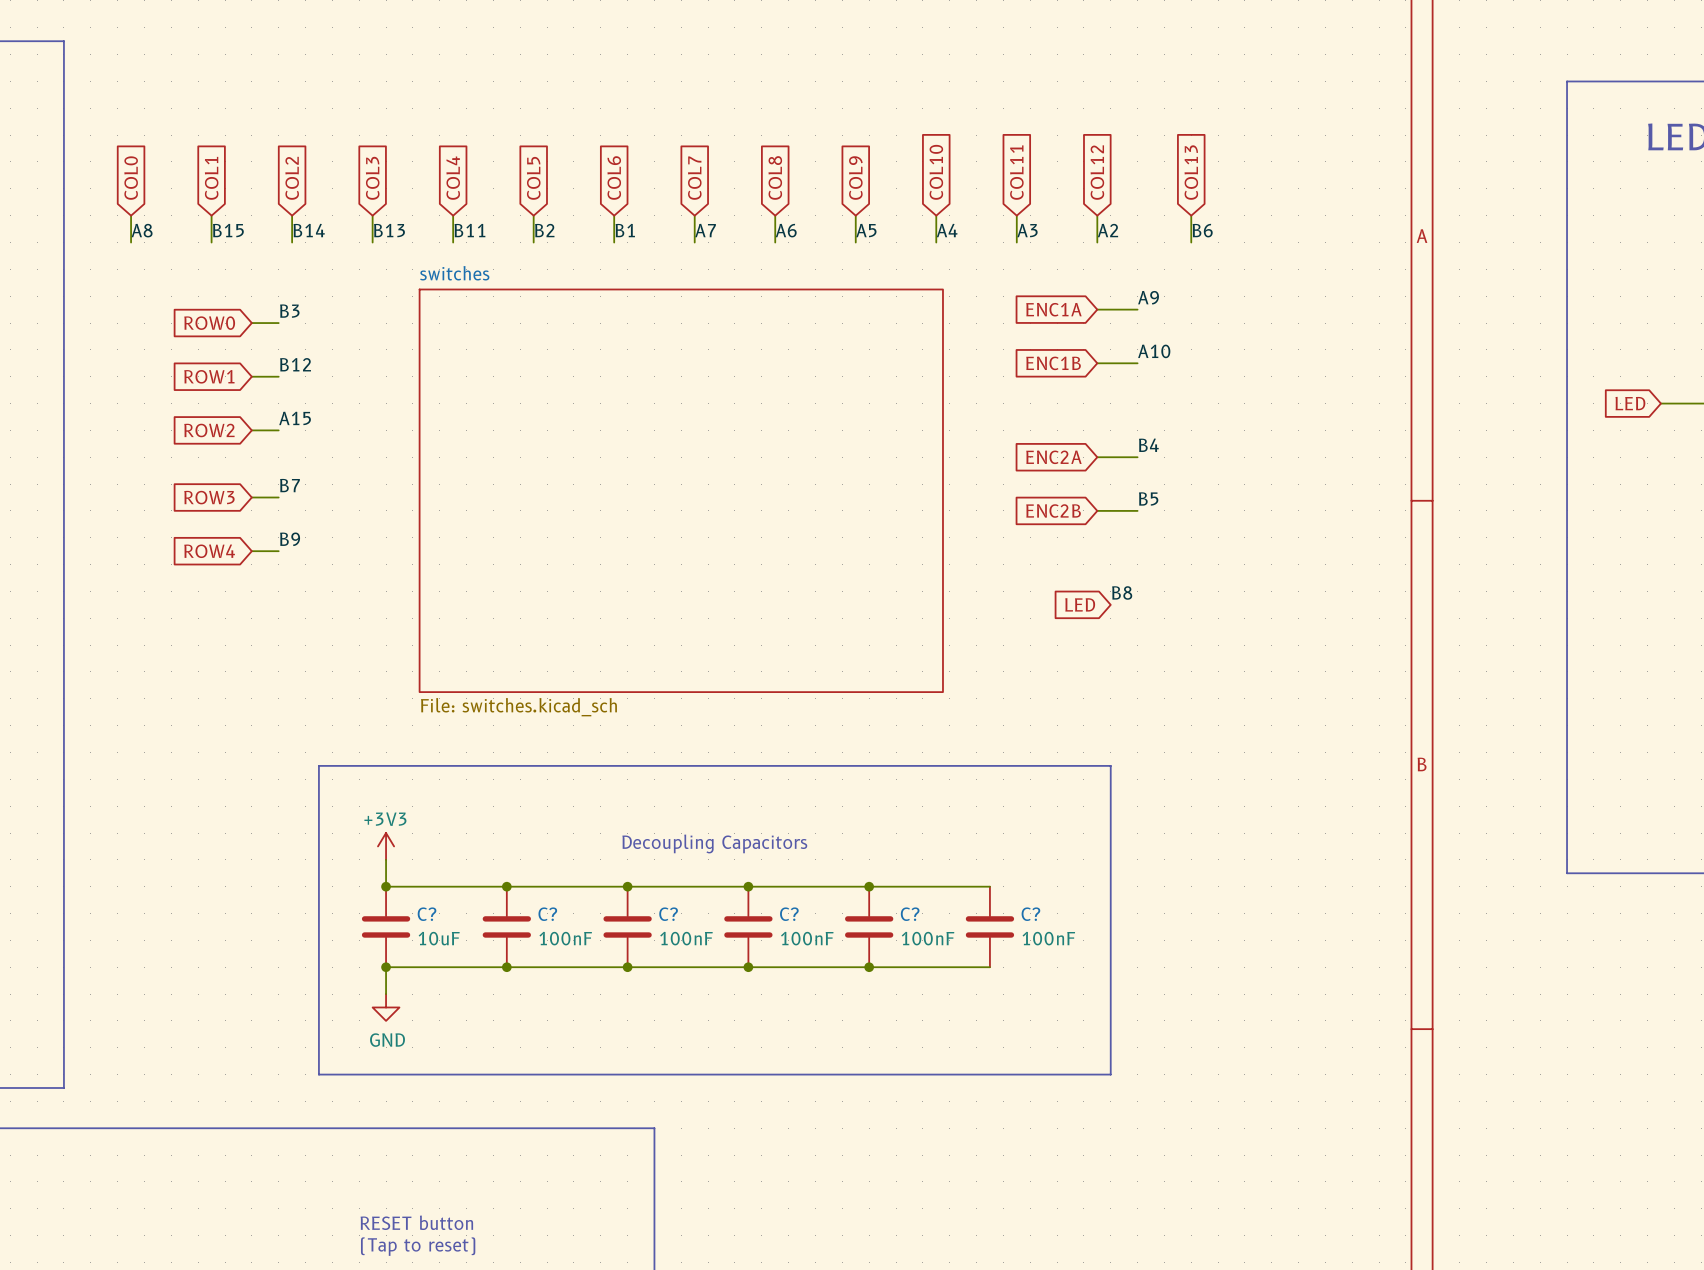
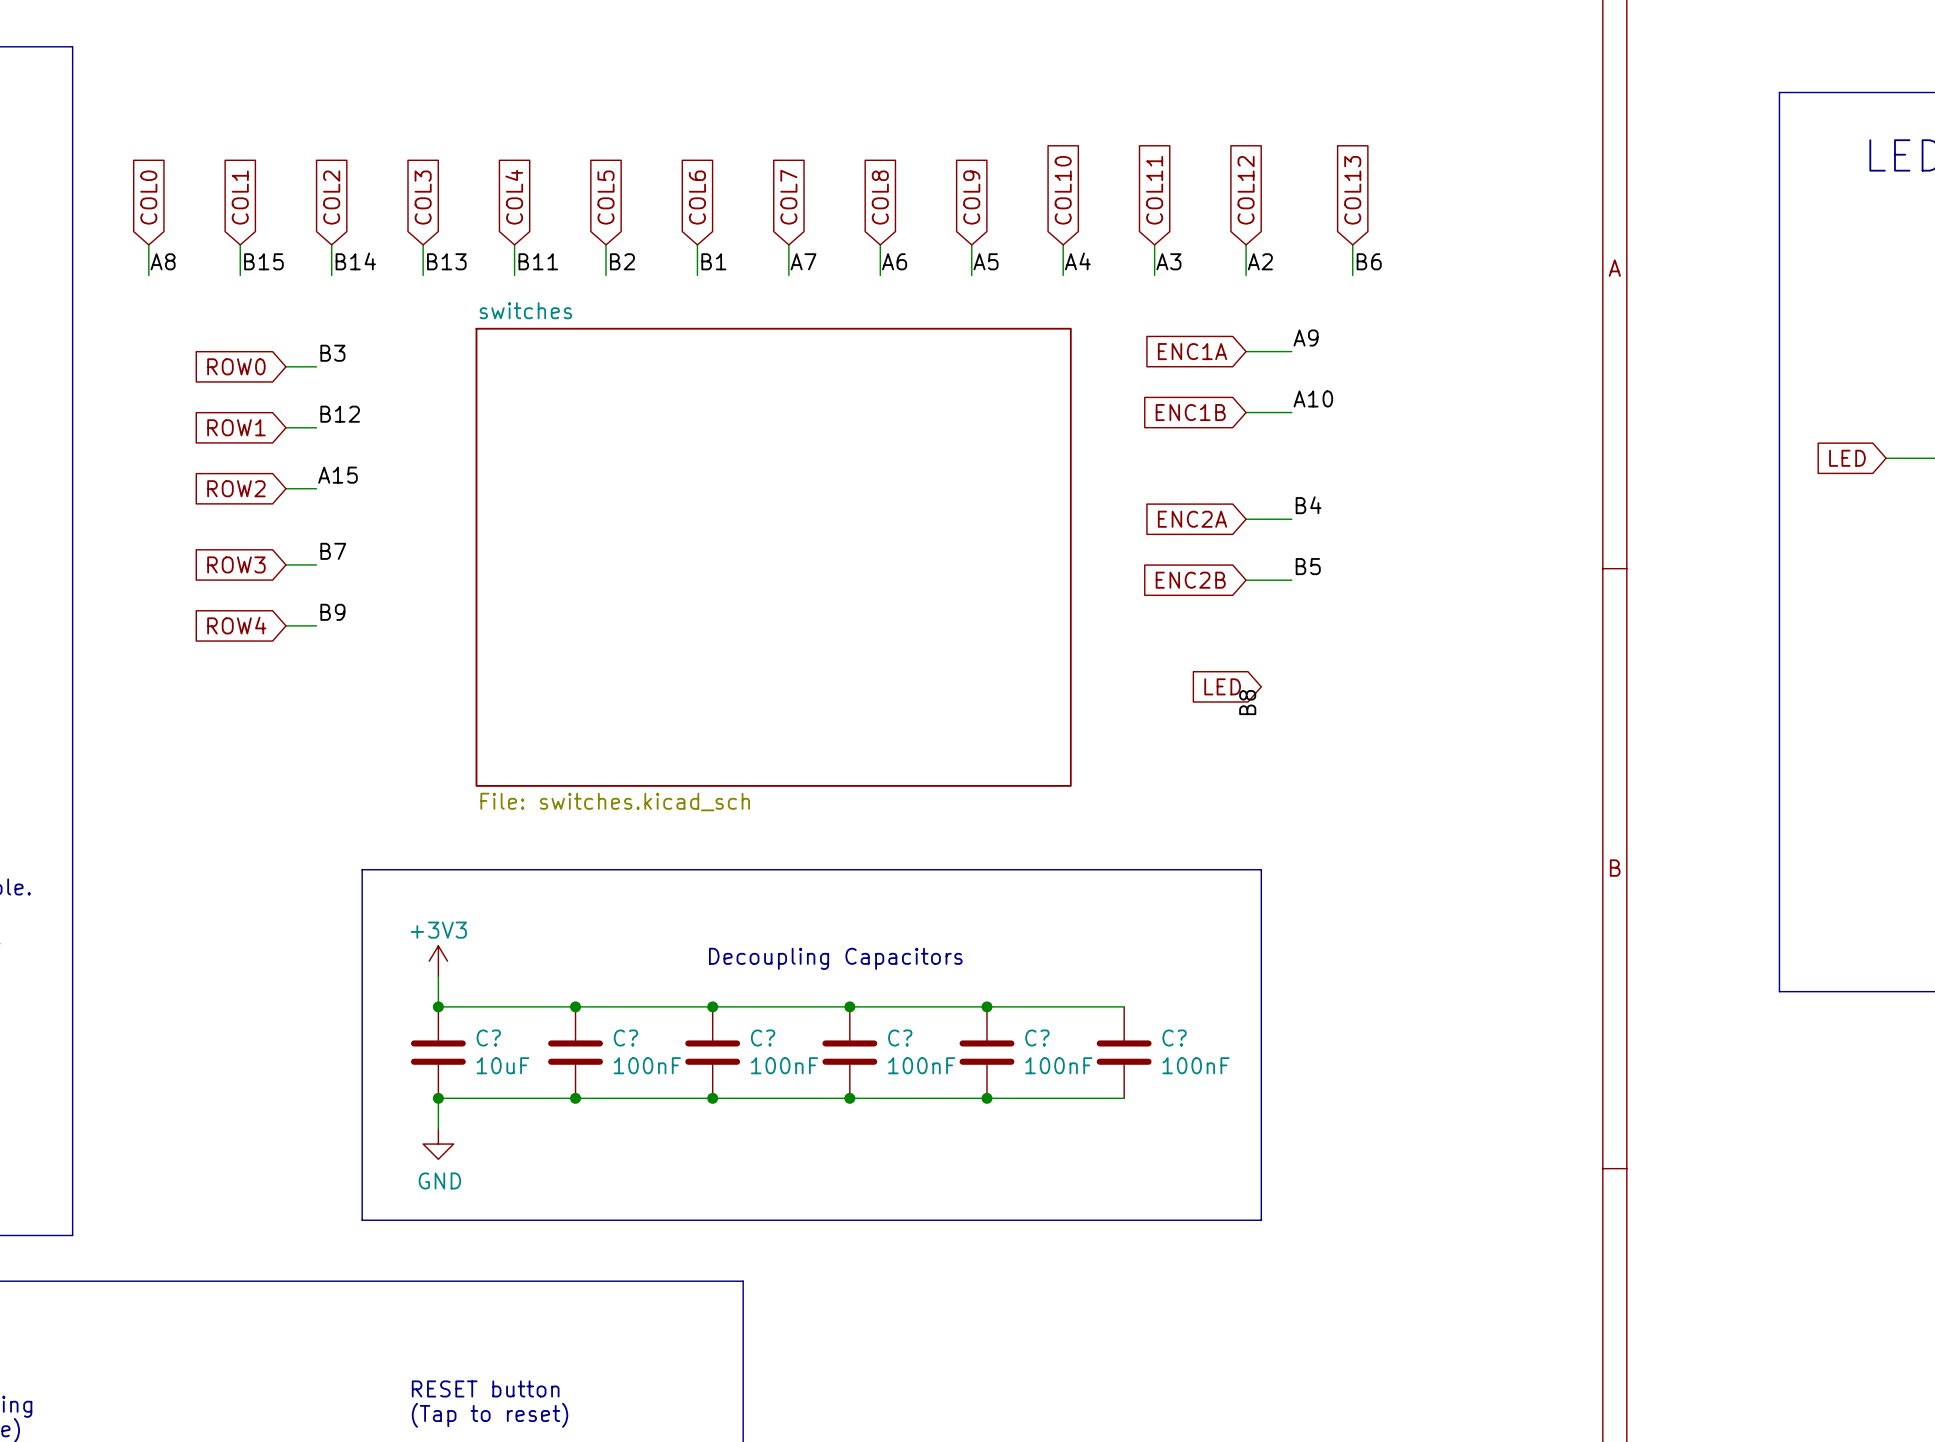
label rotation: 0° (1122, 592) -> 90° counterclockwise (1247, 702)
label position: B8 (1122, 592) -> B8 (1247, 702)

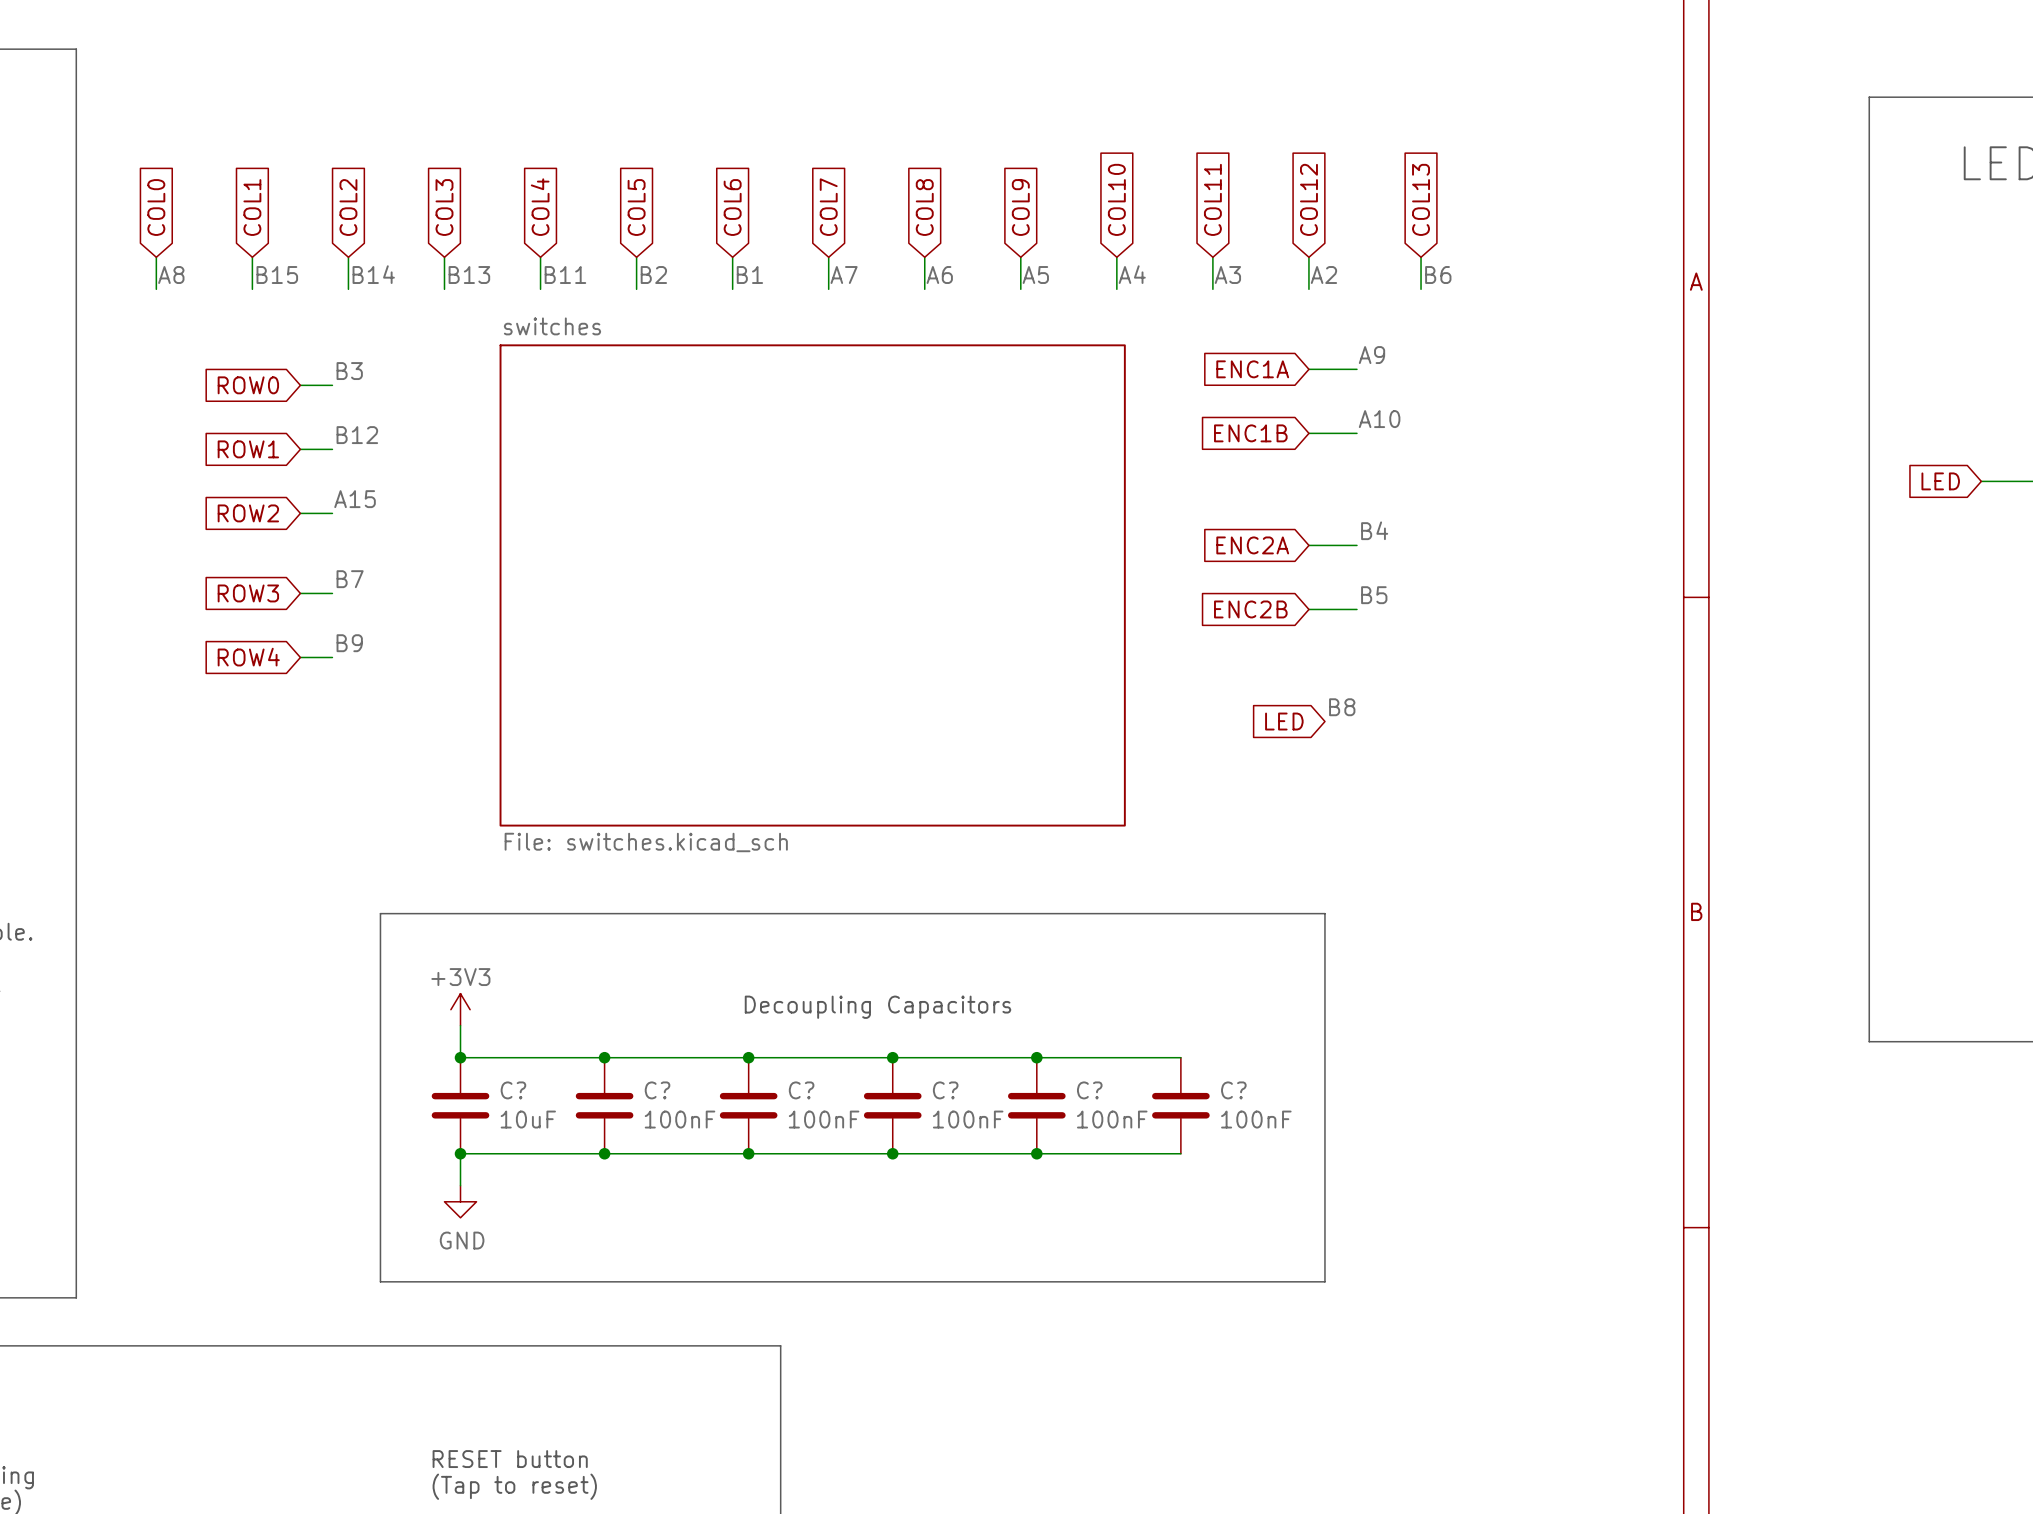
label rotation: 0° (1247, 702) -> 90° clockwise (1342, 707)
label position: B8 (1247, 702) -> B8 (1342, 707)

